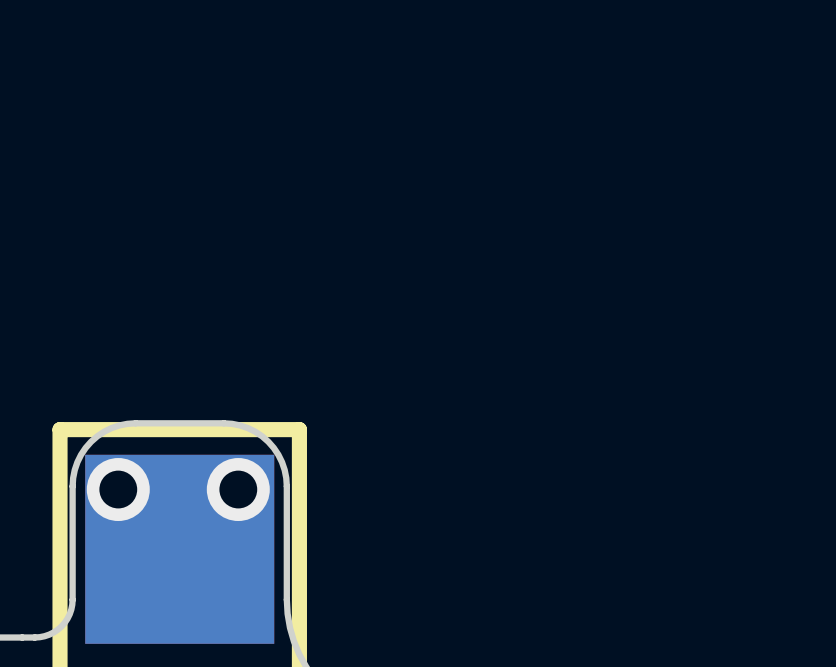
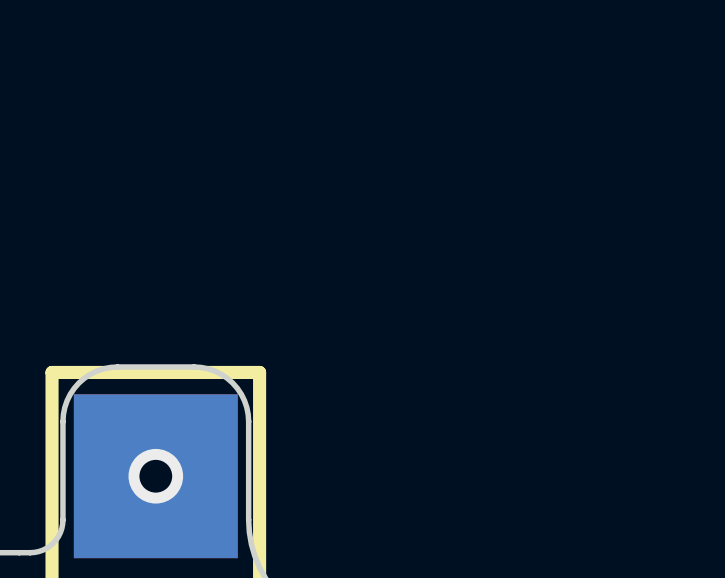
via: (118, 489) -> none
via: (238, 489) -> none
via: none -> (155, 476)

